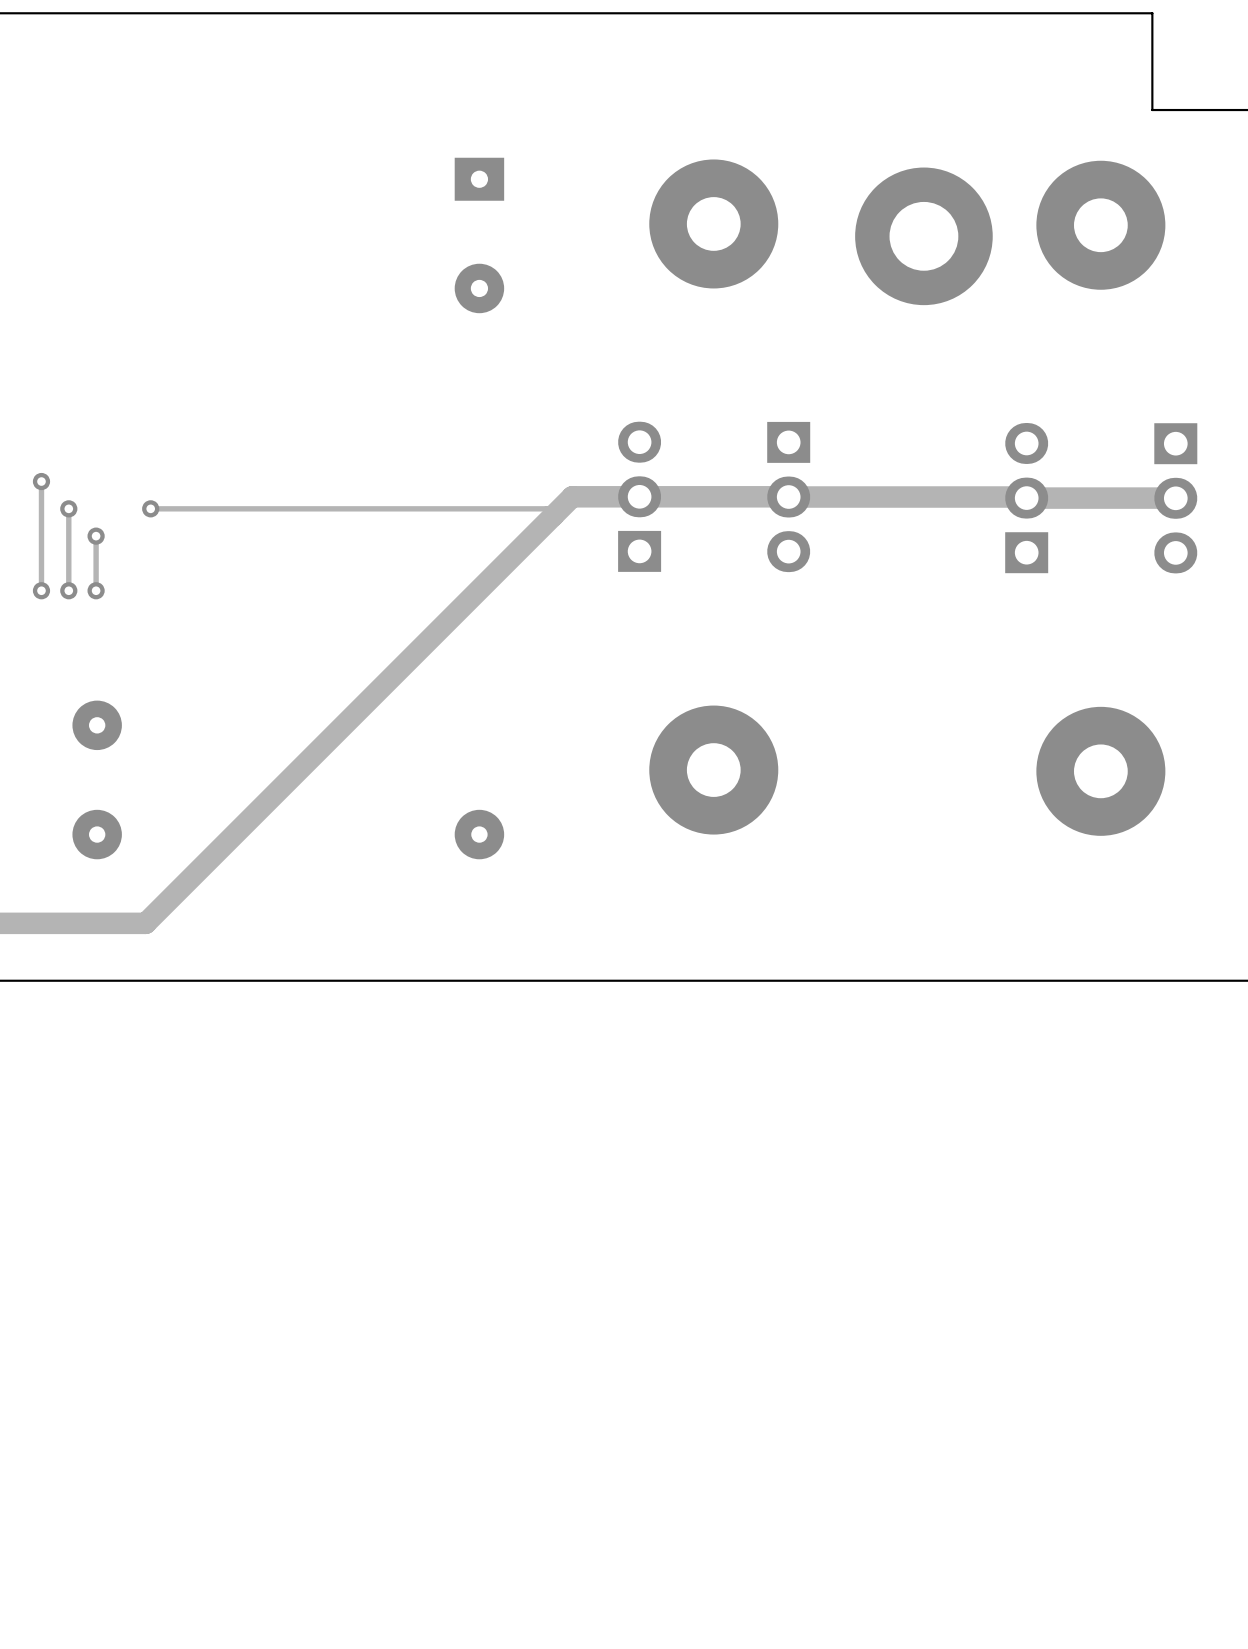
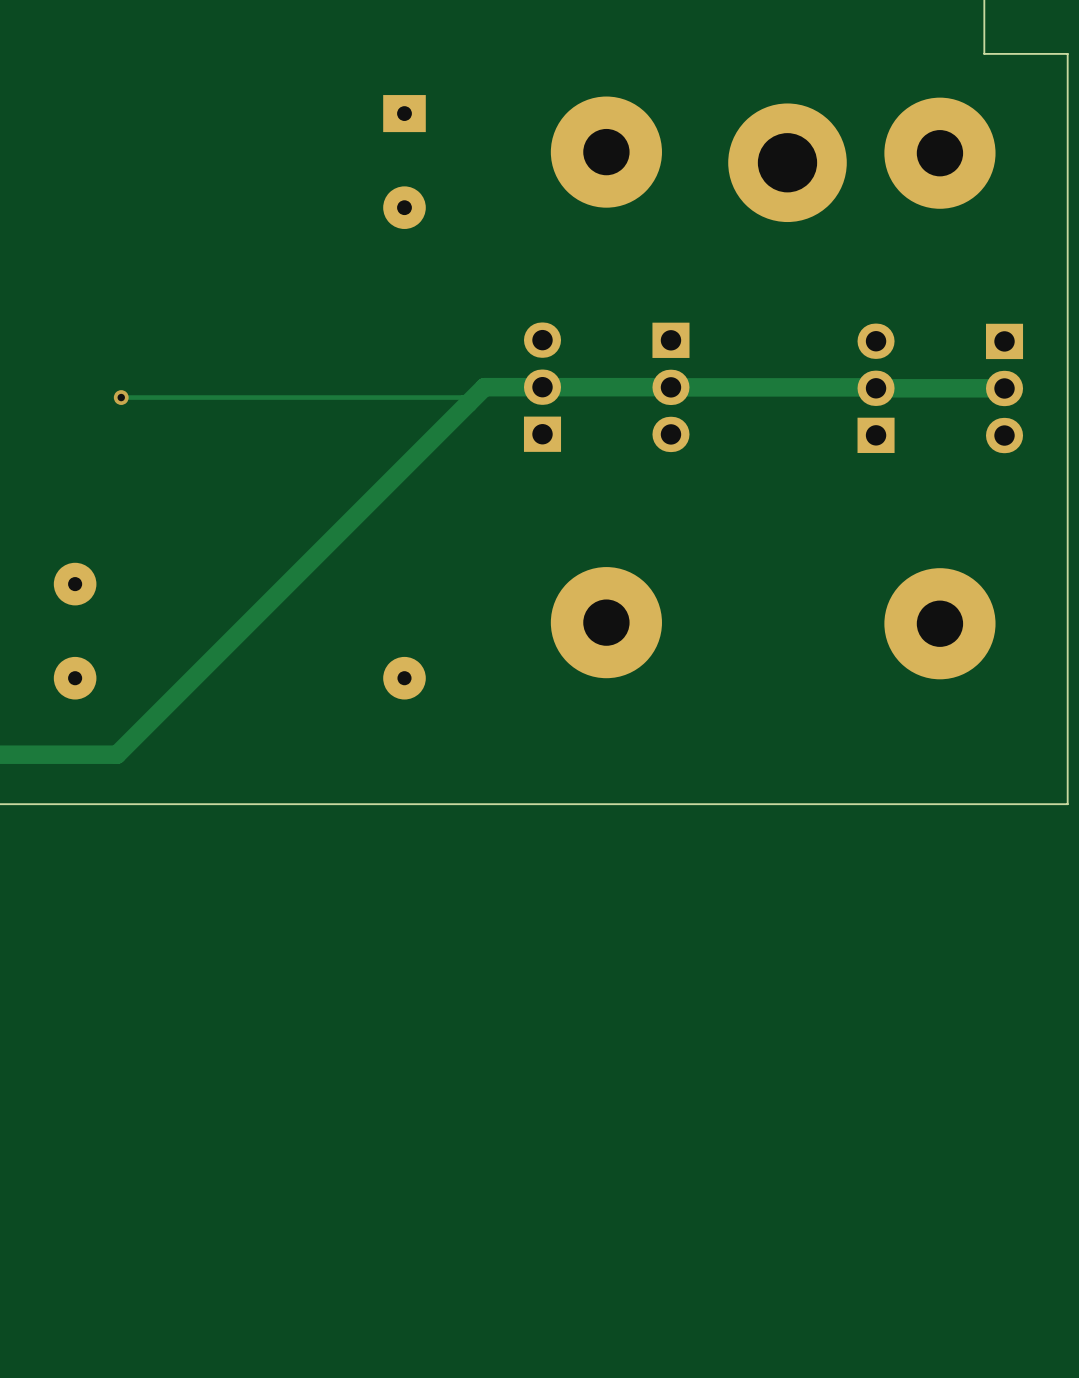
track: (41, 481) (41, 590) -> none
via: (41, 481) -> none
track: (68, 508) (68, 590) -> none
via: (68, 508) -> none
track: (96, 536) (96, 590) -> none
via: (96, 536) -> none
via: (41, 590) -> none
via: (68, 590) -> none
via: (96, 590) -> none

